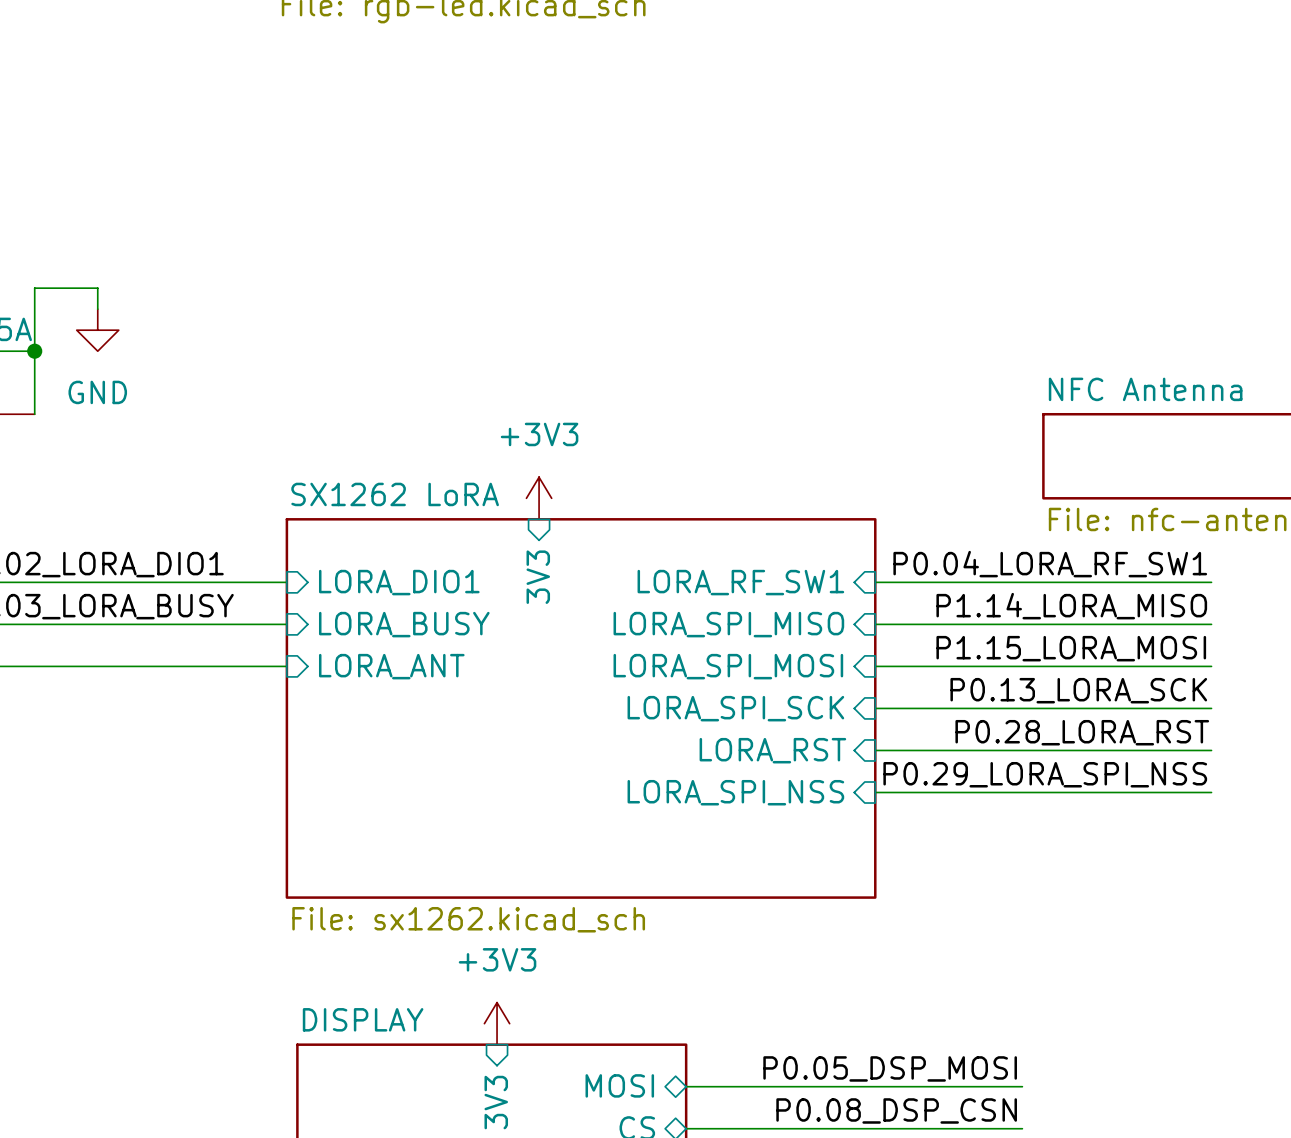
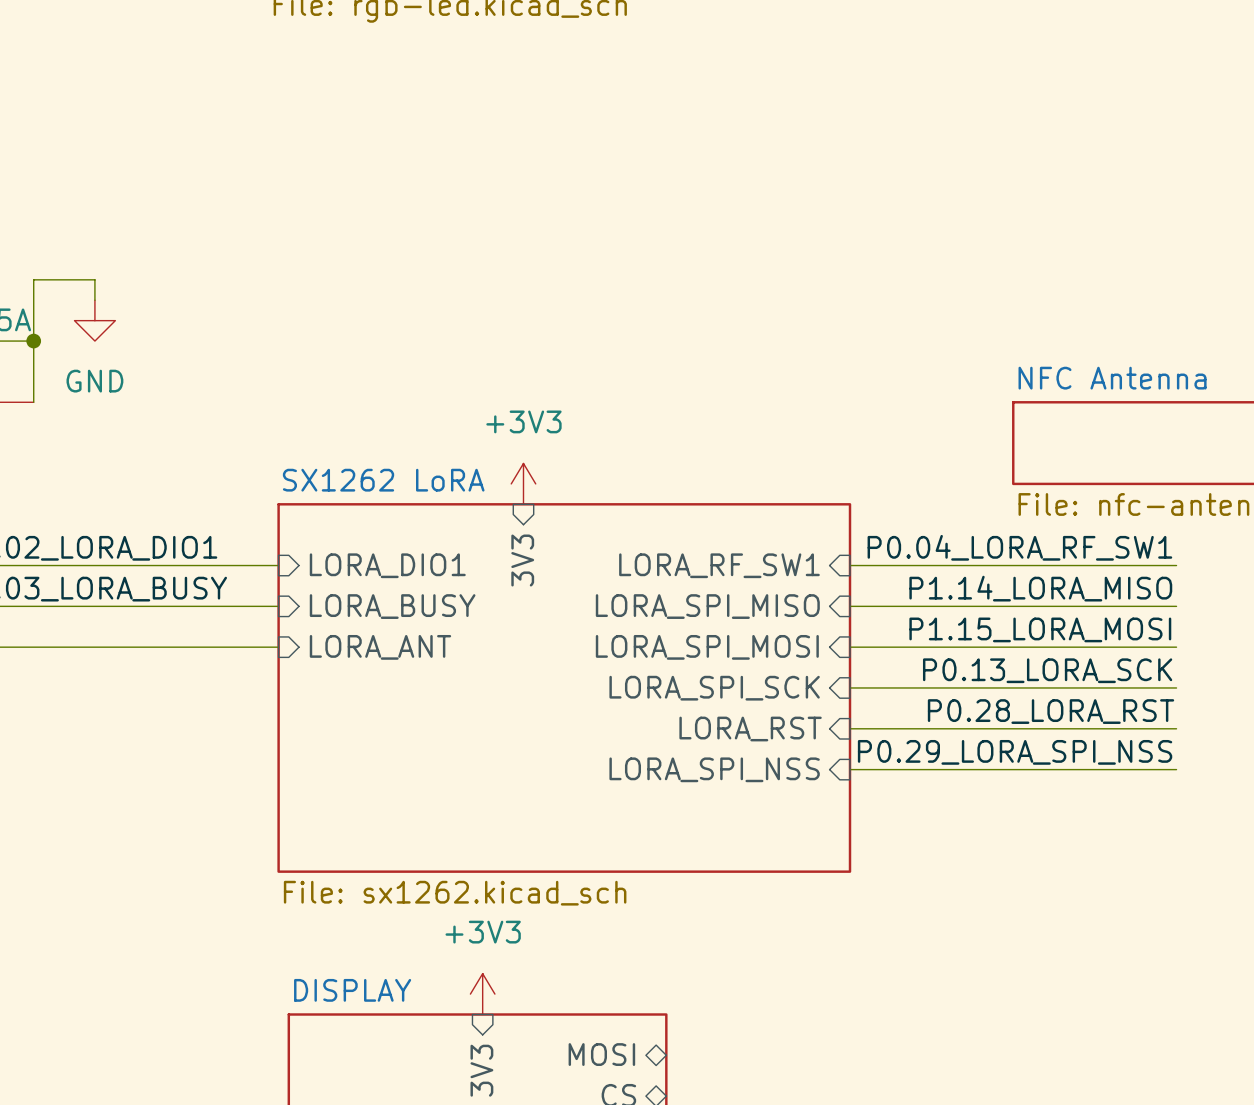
label: P0.05_DSP_MOSI (890, 1068) -> none
wire: (686, 1086) (1022, 1086) -> none
label: P0.08_DSP_CSN (896, 1110) -> none
wire: (686, 1128) (1022, 1128) -> none

